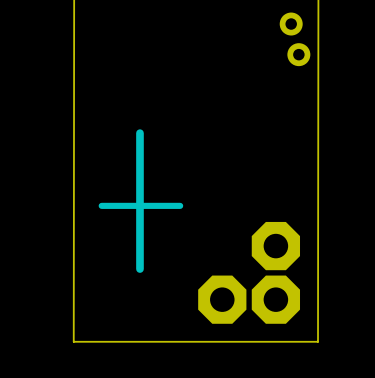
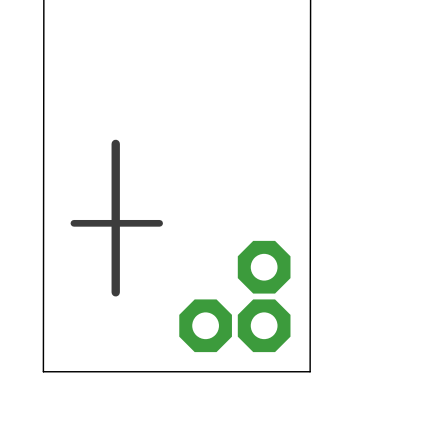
part: (291, 24) -> none
part: (298, 54) -> none

